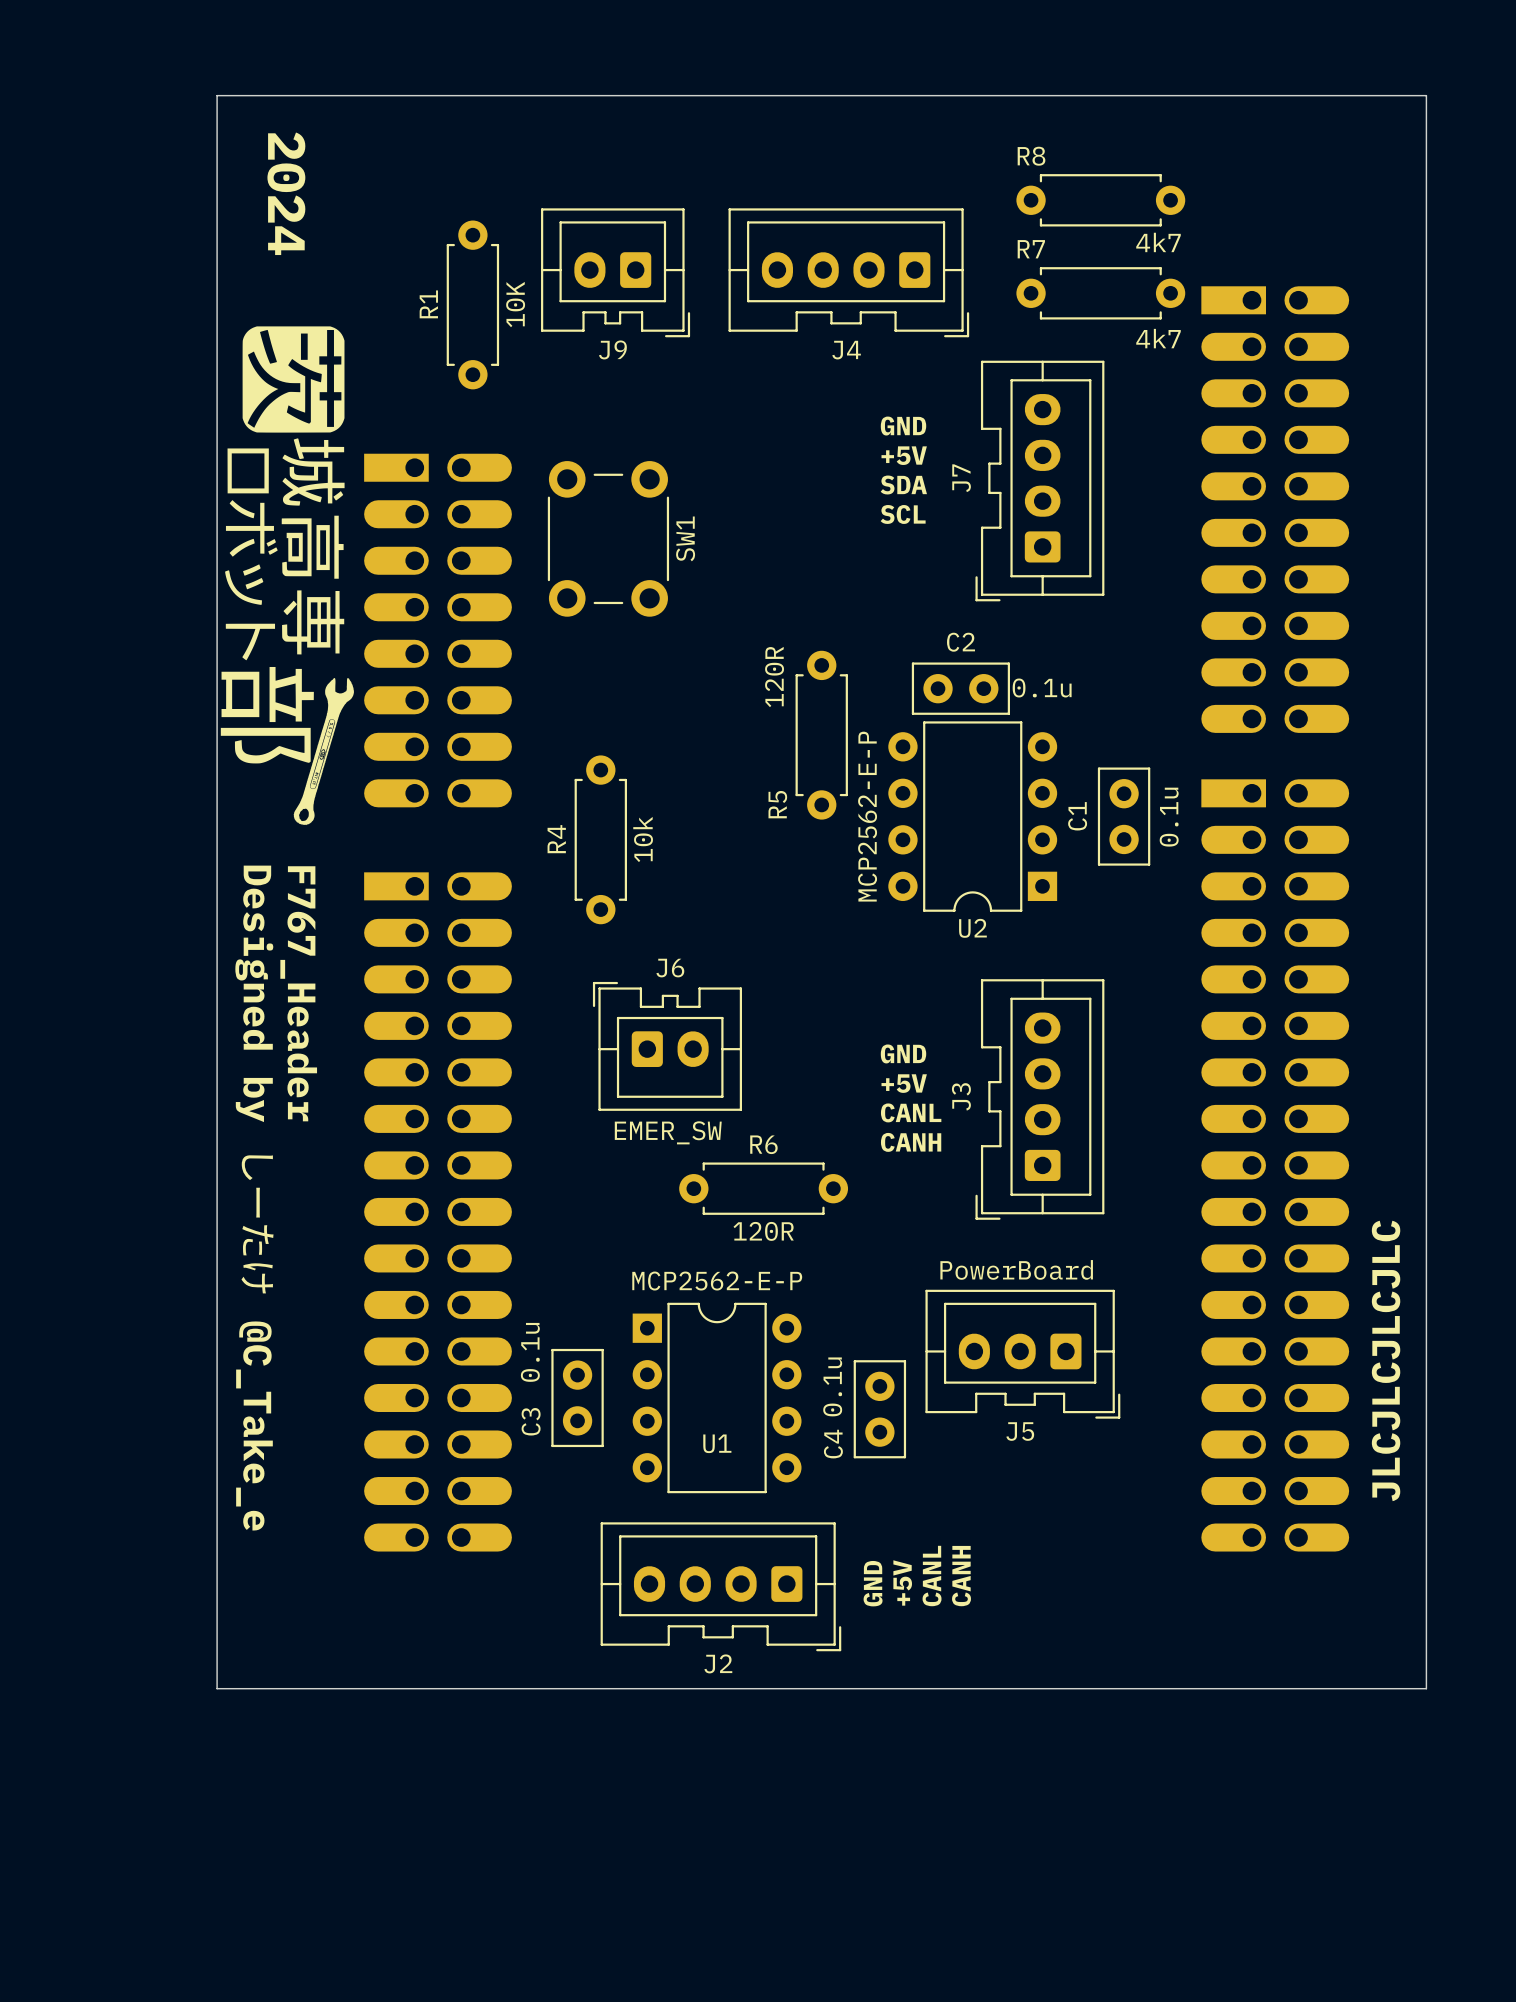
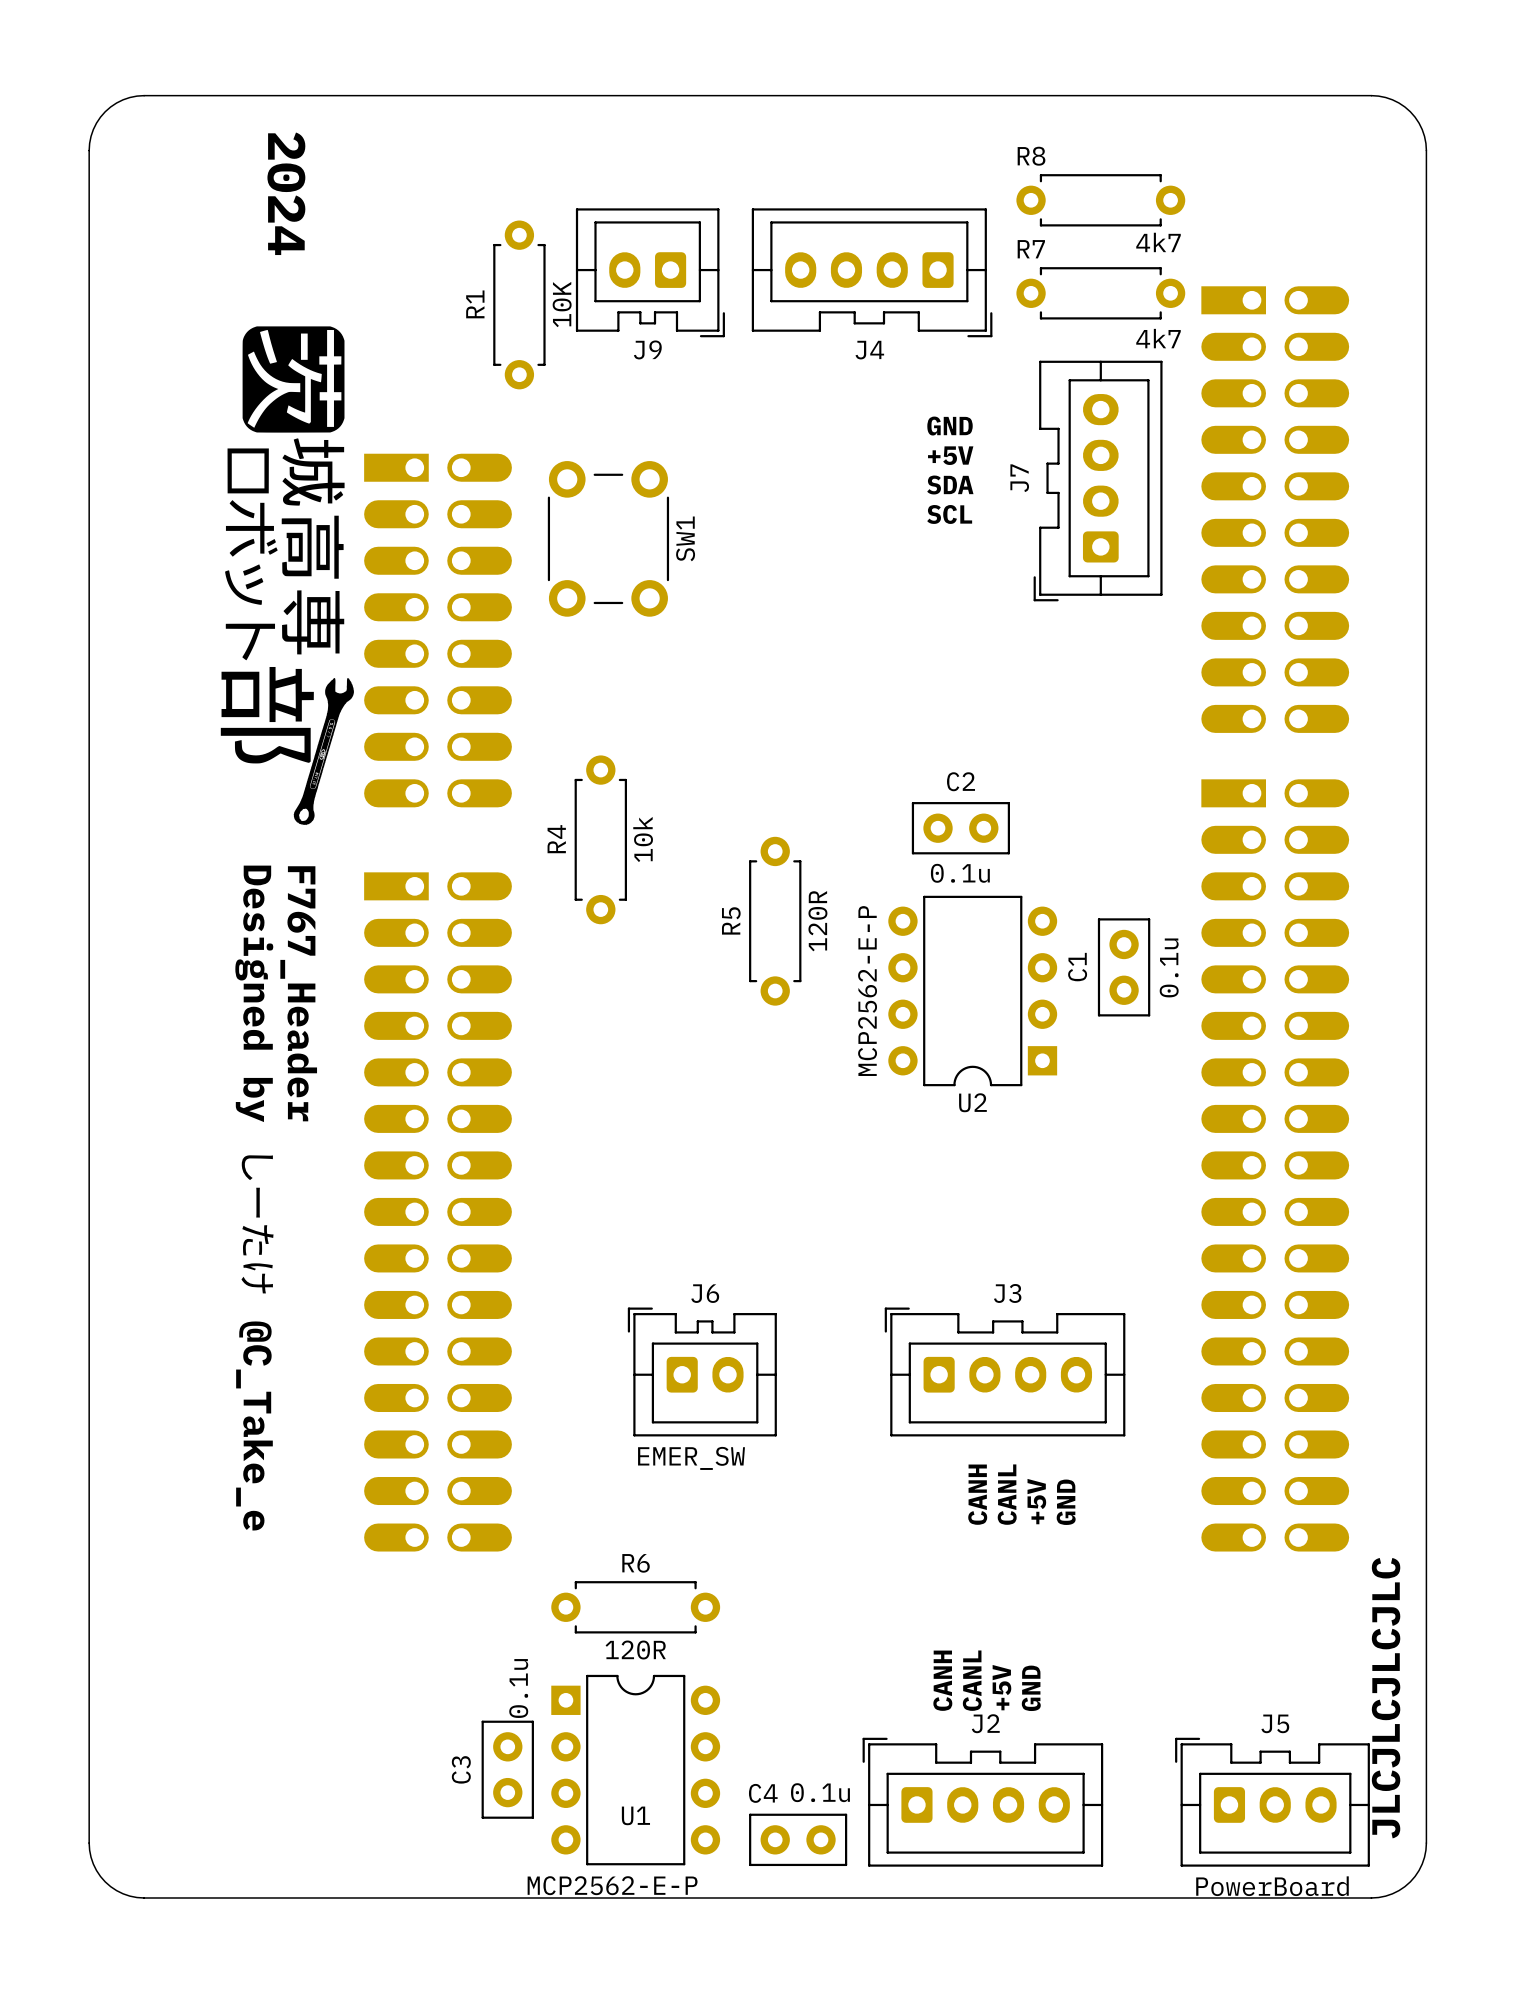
board edge: (217, 95) (217, 1688) (1426, 1688) -> (217, 95) (144, 95) (123, 99) (110, 106) (100, 117) (93, 129) (89, 150) (89, 1843) (91, 1857) (100, 1876) (116, 1890) (129, 1896) (144, 1897) (1378, 1897) (1392, 1893) (1404, 1886) (1419, 1870) (1424, 1857) (1426, 1843) (1426, 1688)
board edge: (1371, 95) (1426, 95) (1426, 150) -> (1371, 95) (1392, 99) (1410, 111) (1422, 129) (1426, 150)
J9 position: (615, 272) -> (650, 272)
J4 position: (848, 272) -> (872, 272)
R1 position: (472, 304) -> (519, 304)
text position: GND (903, 426) -> GND (950, 426)
text position: +5V (904, 455) -> +5V (950, 455)
J7 position: (1039, 481) -> (1098, 481)
text position: SDA (903, 485) -> SDA (950, 485)
text position: SCL (903, 514) -> SCL (949, 514)
R5 value position: 120R (774, 677) -> 120R (817, 921)
C2 value position: 0.1u (1042, 687) -> 0.1u (960, 873)
C2 position: (960, 688) -> (960, 828)
R5 position: (821, 735) -> (775, 921)
R5 name position: R5 (777, 804) -> R5 (731, 920)
U2 position: (972, 816) -> (972, 991)
C1 position: (1124, 816) -> (1124, 967)
J6 position: (667, 1046) -> (702, 1371)
text: GND (903, 1053) -> none
text: +5V (904, 1083) -> none
J3 rotation: 0° (1039, 1099) -> 90° clockwise (1005, 1371)
J3 position: (1039, 1099) -> (1005, 1371)
text: CANL (911, 1112) -> none
text position: EMER_SW (668, 1132) -> EMER_SW (691, 1458)
text: CANH (911, 1142) -> none
R6 position: (763, 1188) -> (635, 1607)
text: PowerBoard (1016, 1269) -> none
U1 value position: MCP2562-E-P (717, 1281) -> MCP2562-E-P (612, 1885)
C3 value position: 0.1u (530, 1352) -> 0.1u (518, 1688)
J5 rotation: 0° (1022, 1354) -> 180° (1272, 1802)
J5 position: (1022, 1354) -> (1272, 1802)
text position: JLCJLCJLCJLC (1386, 1360) -> JLCJLCJLCJLC (1386, 1698)
C3 position: (577, 1397) -> (507, 1769)
U1 position: (717, 1397) -> (635, 1770)
C4 rotation: 0° (879, 1409) -> 90° clockwise (798, 1839)
C4 position: (879, 1409) -> (798, 1839)
C3 name position: C3 (531, 1421) -> C3 (461, 1769)
text: none -> CANL (1007, 1494)
text: none -> +5V (1036, 1501)
text: none -> GND (1066, 1502)
text: CANL (932, 1576) -> none
text position: CANH (961, 1576) -> CANH (977, 1494)
text: +5V (902, 1582) -> none
text: GND (873, 1583) -> none
J2 rotation: 0° (720, 1586) -> 180° (982, 1802)
J2 position: (720, 1586) -> (982, 1802)
text: none -> CANH (942, 1680)
text: none -> CANL (972, 1680)
text: none -> +5V (1001, 1687)
text: none -> GND (1031, 1688)
text: none -> PowerBoard (1272, 1886)

